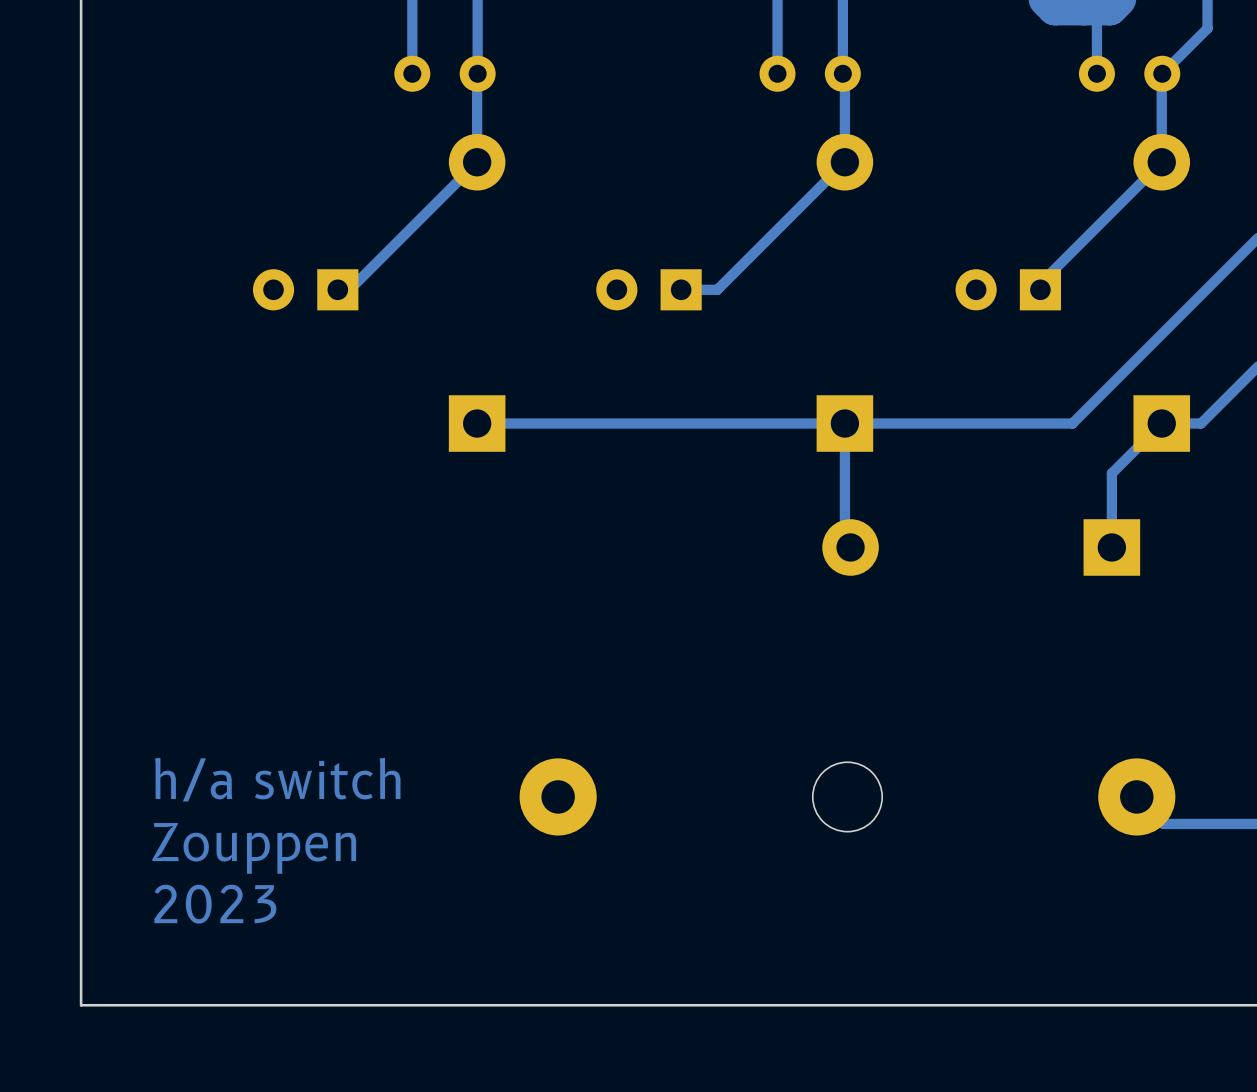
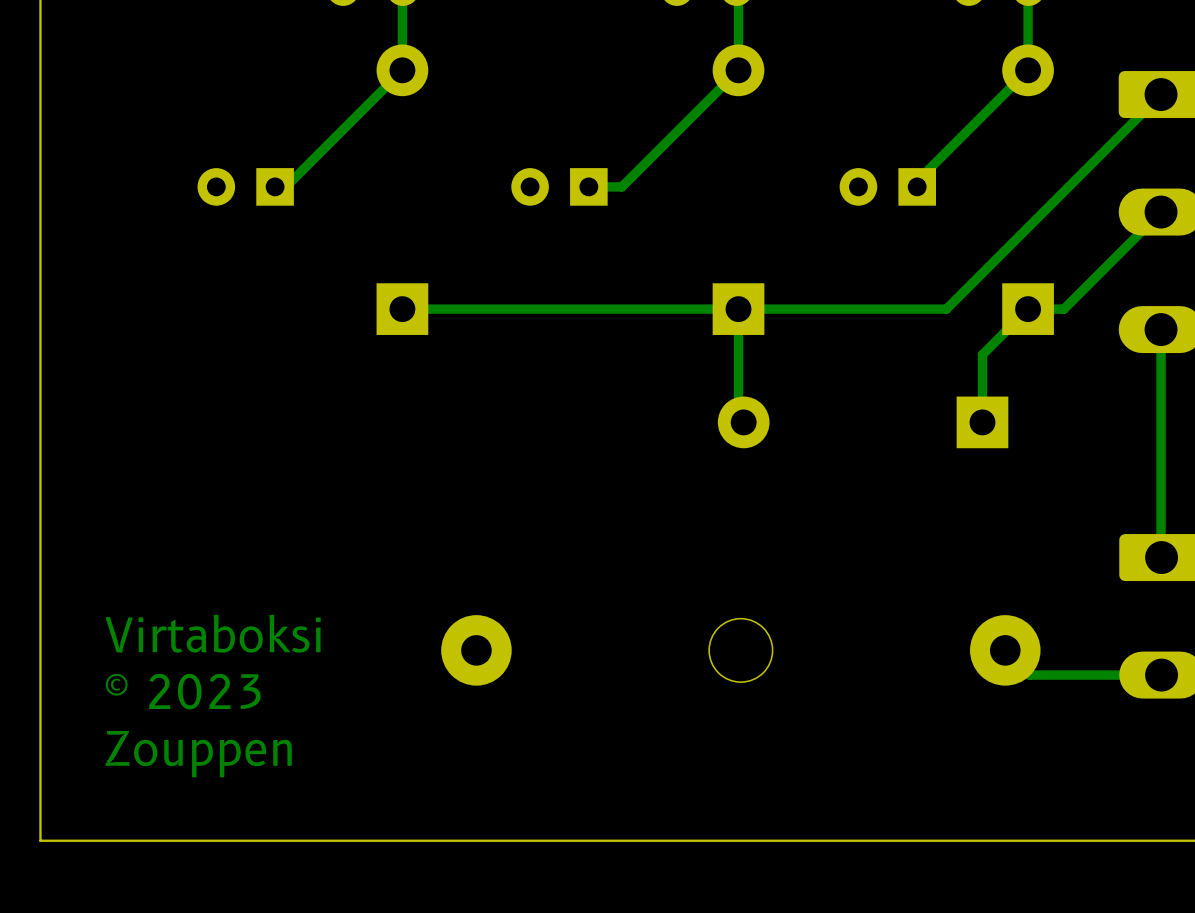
text: h/a switch (277, 779) -> Virtaboksi (213, 633)
text: Zouppen (254, 848) -> © 2023 (183, 691)
text: 2023 (215, 904) -> Zouppen (198, 754)

